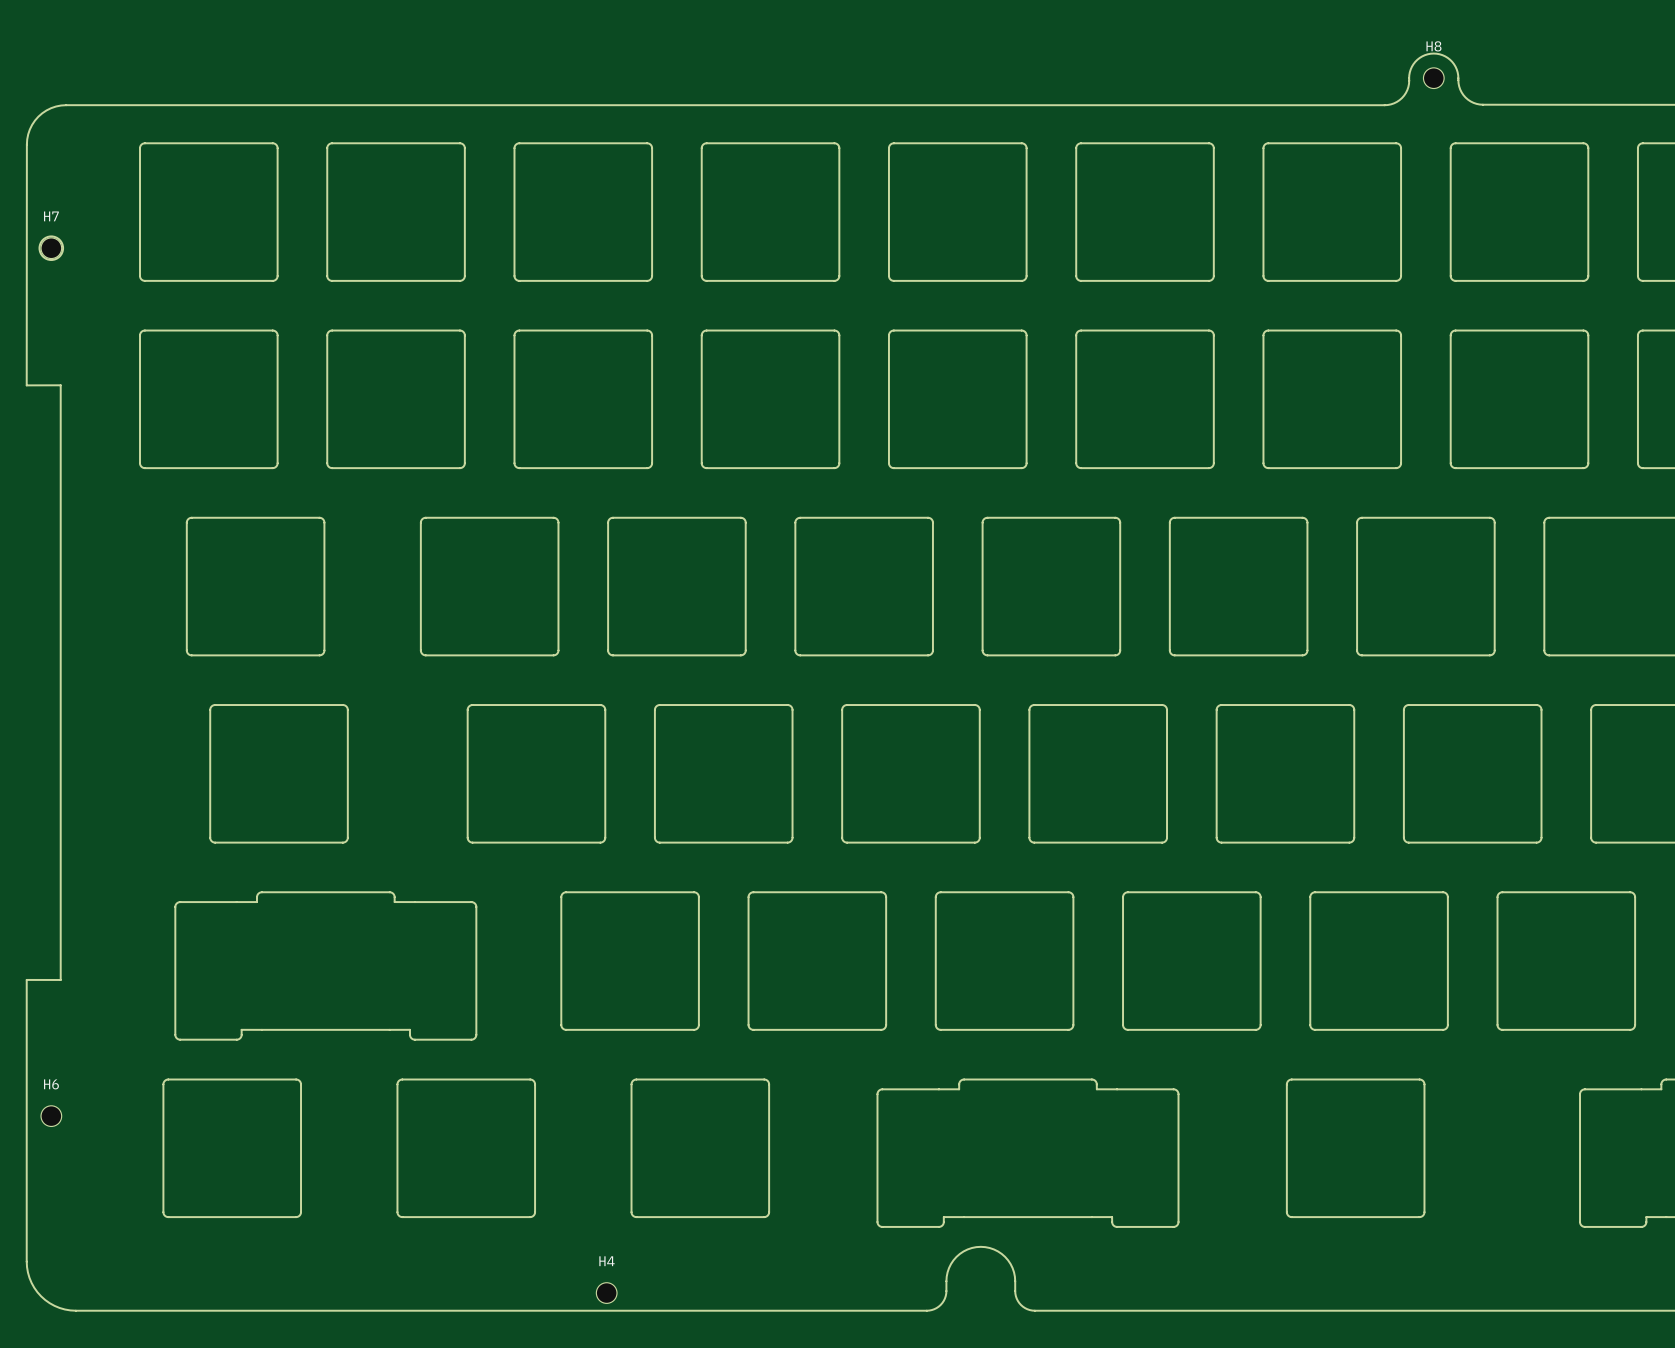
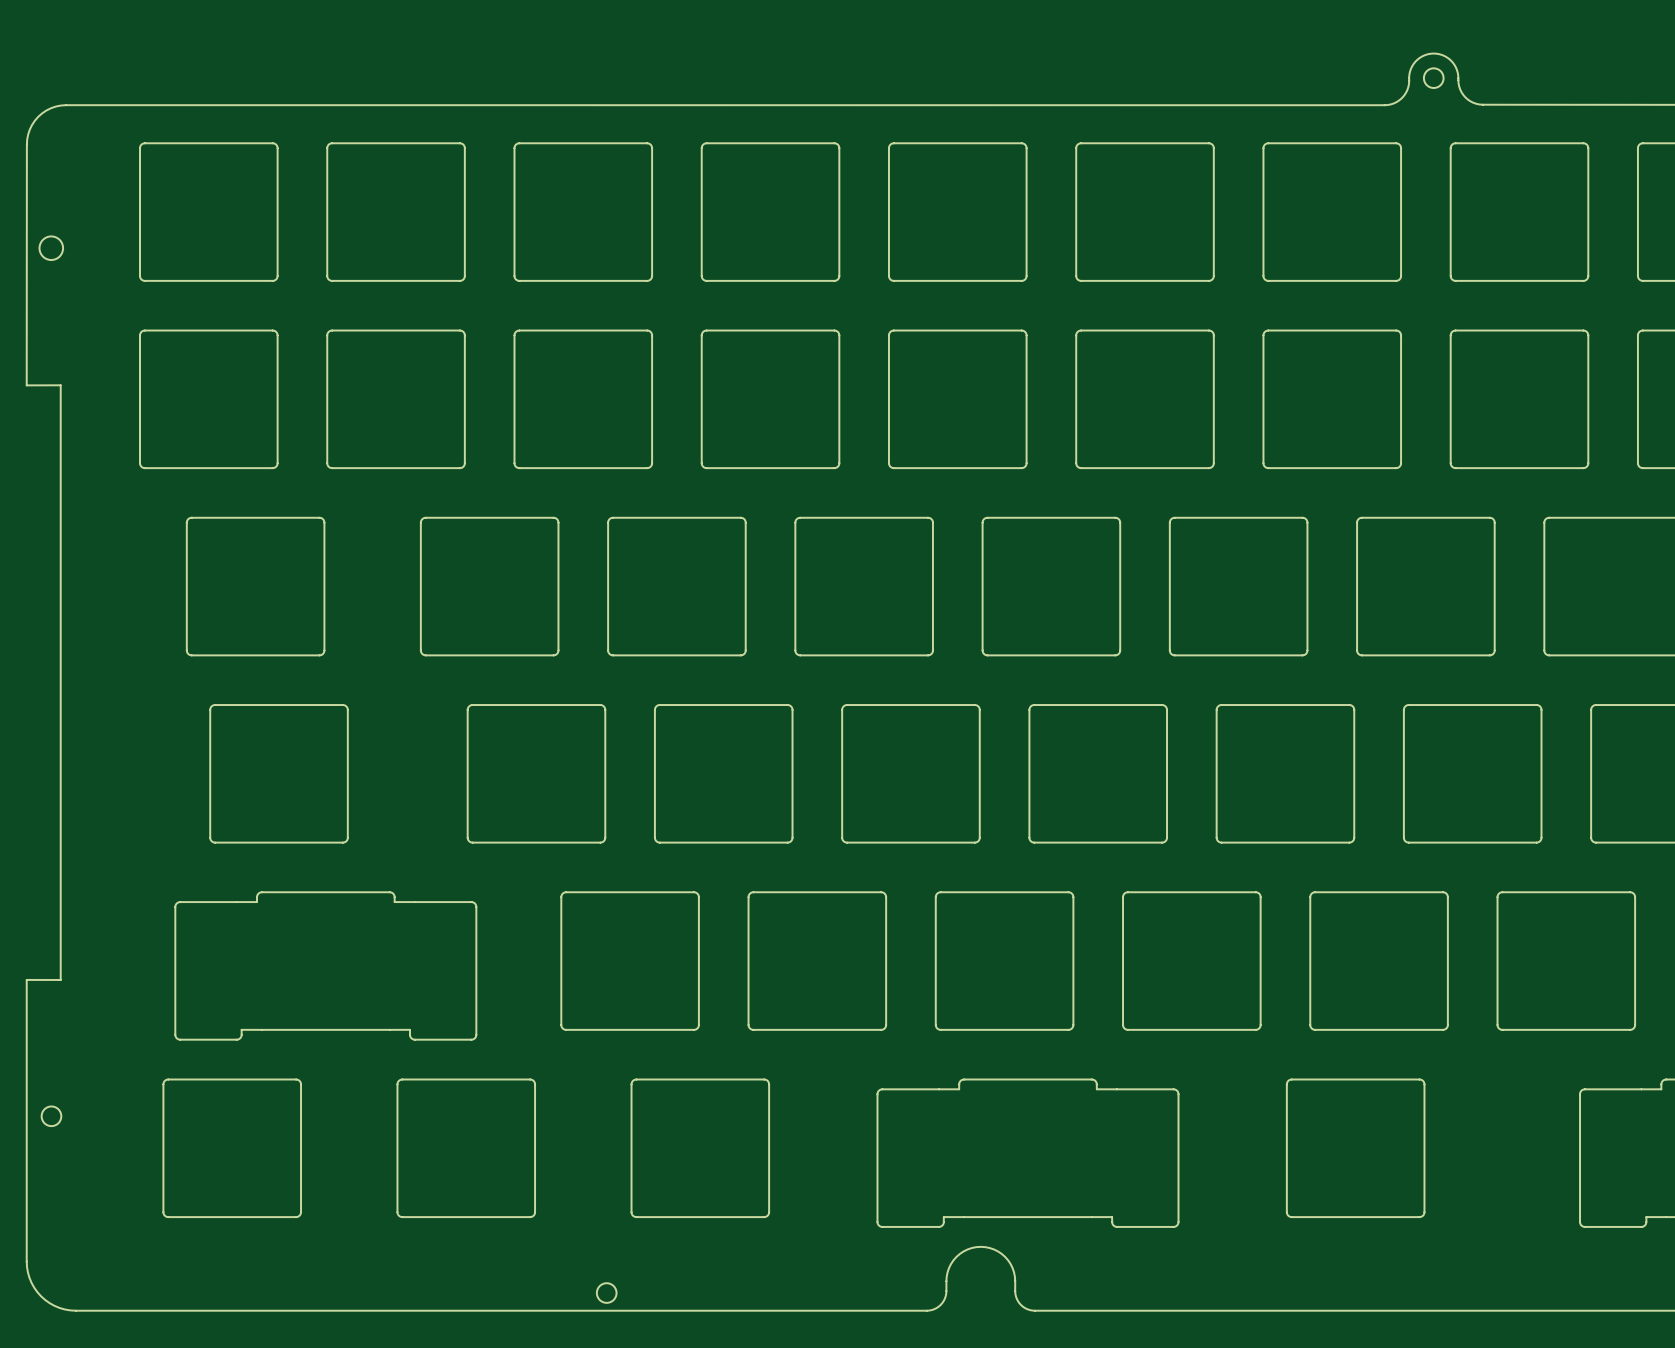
round board edge: none -> [1422, 67, 1445, 89]
H8: (1433, 78) -> none
H7: (51, 248) -> none
round board edge: none -> [40, 1105, 63, 1128]
H6: (51, 1116) -> none
round board edge: none -> [595, 1282, 618, 1304]
H4: (606, 1293) -> none

